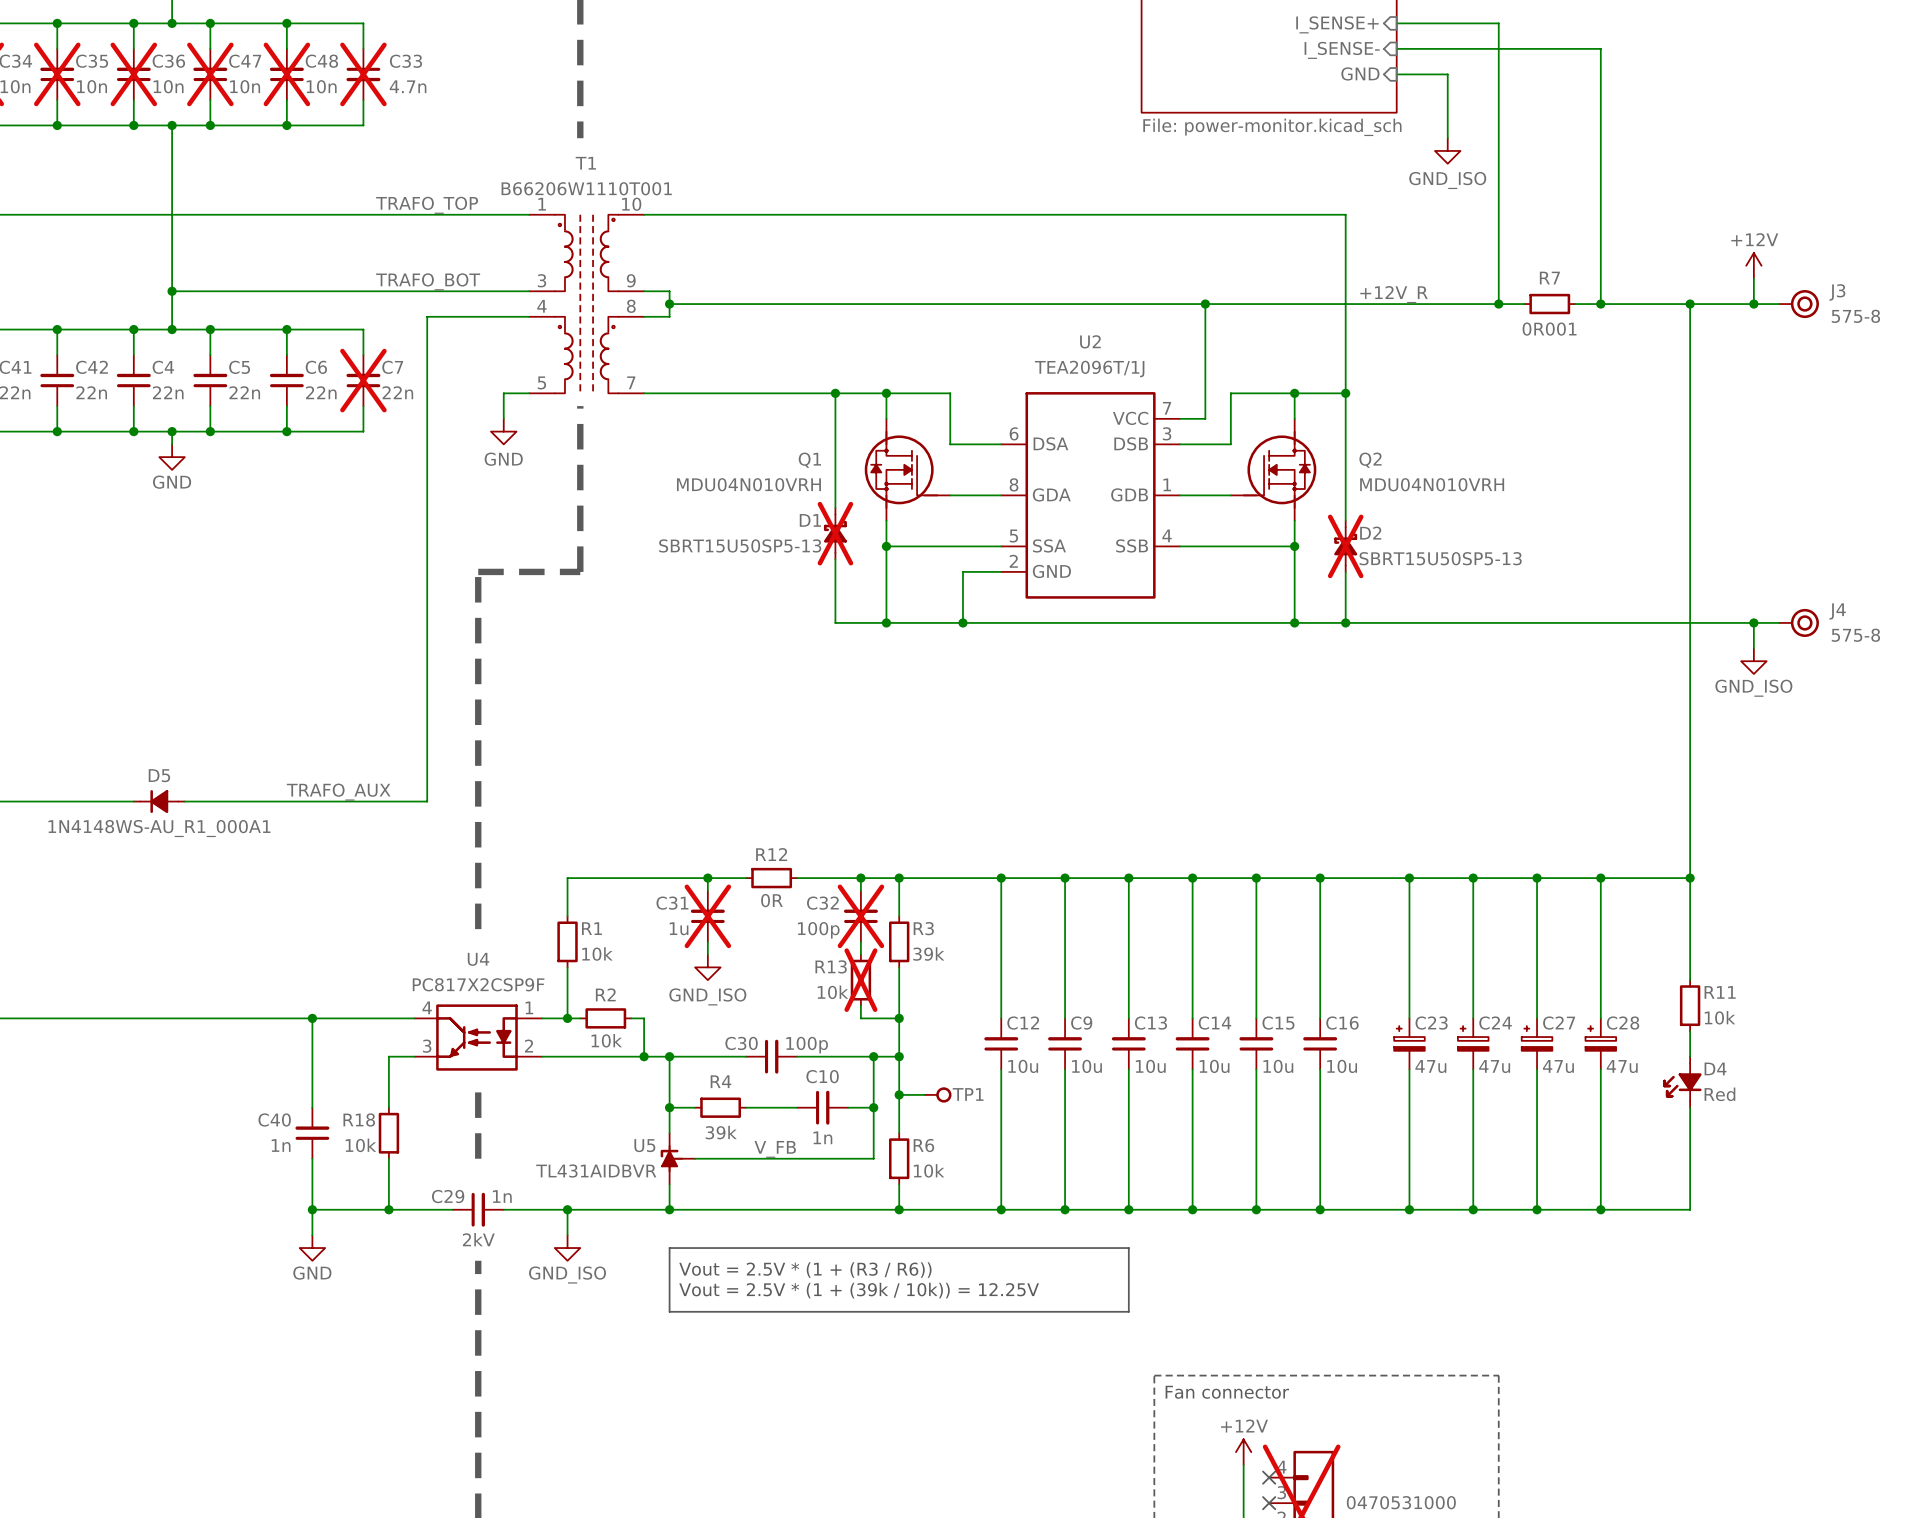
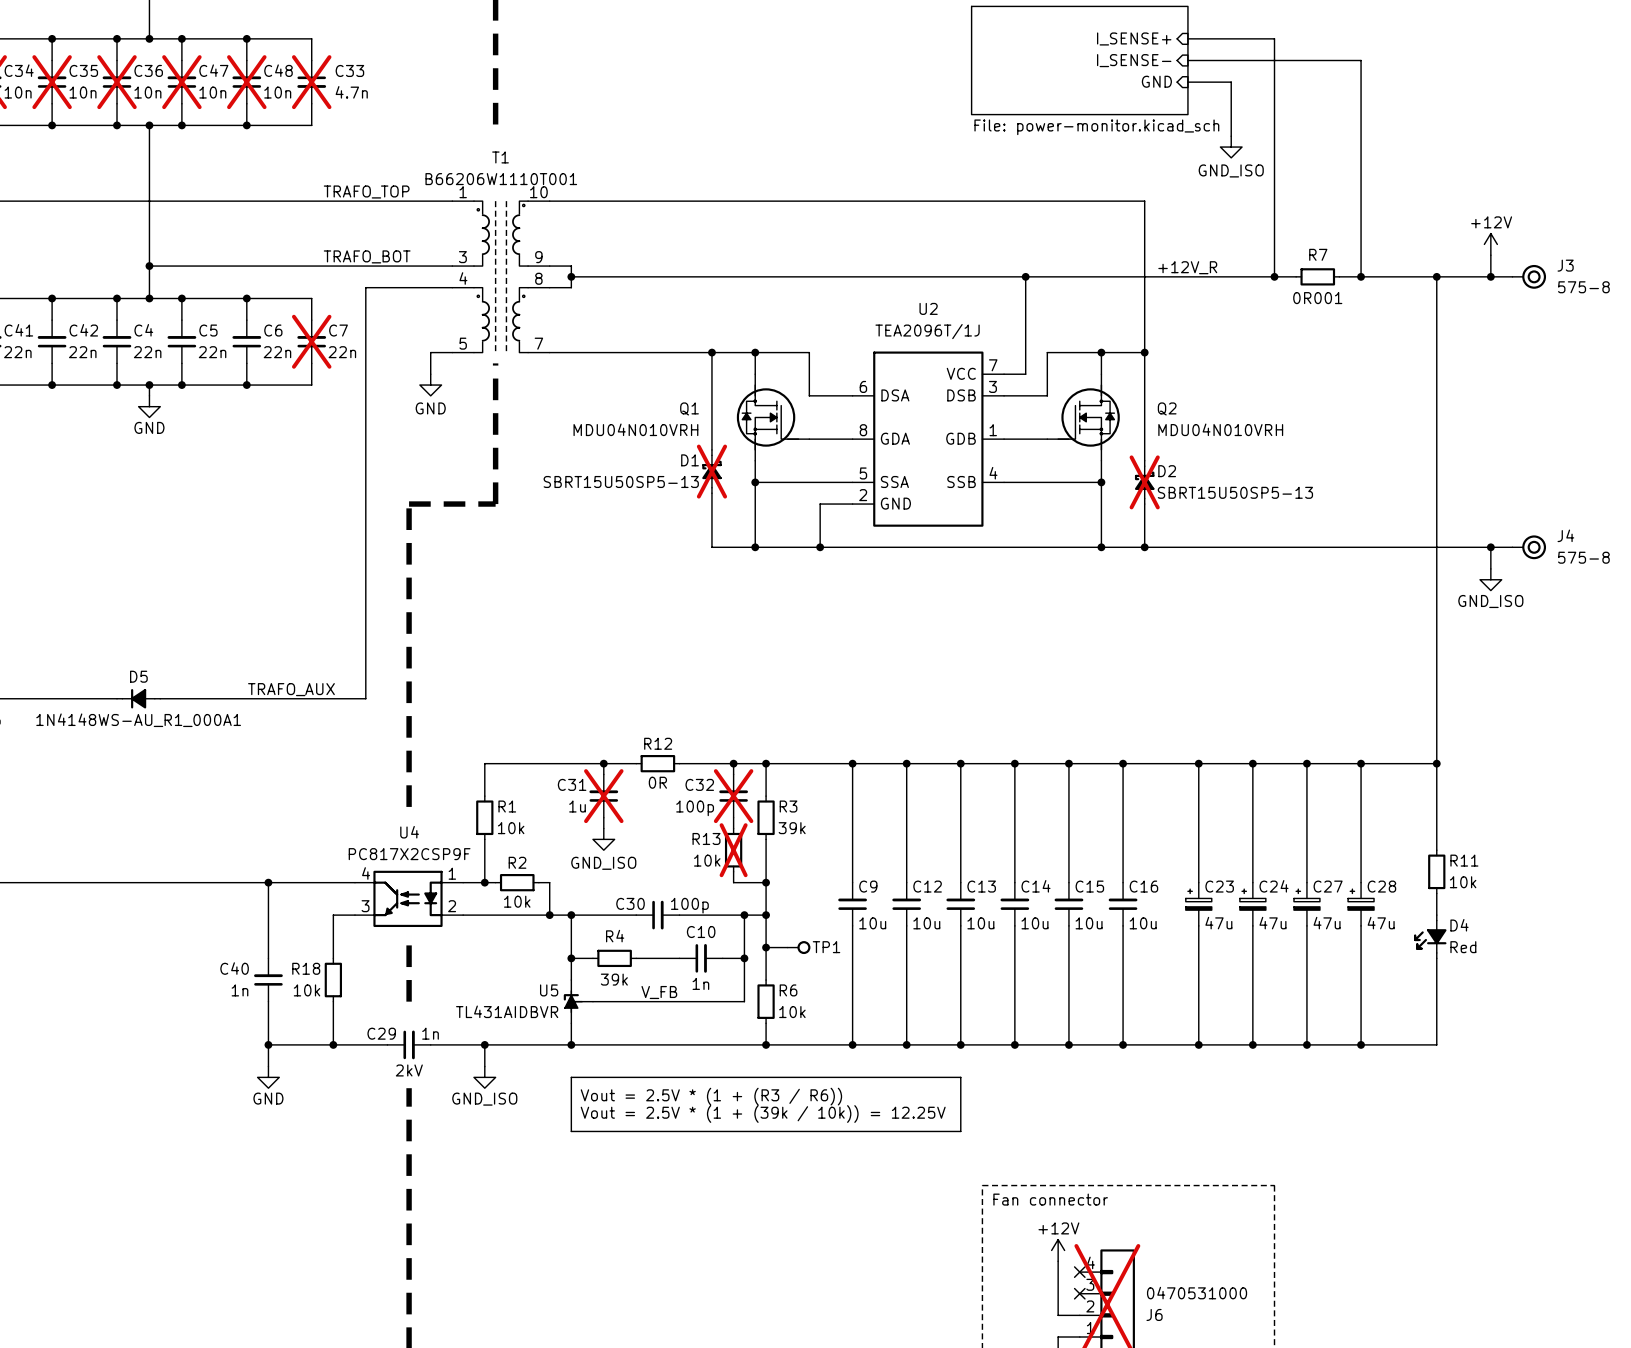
C12 name: C12 (1023, 1023) -> C9 (868, 886)
C9 name: C9 (1081, 1023) -> C12 (927, 886)

